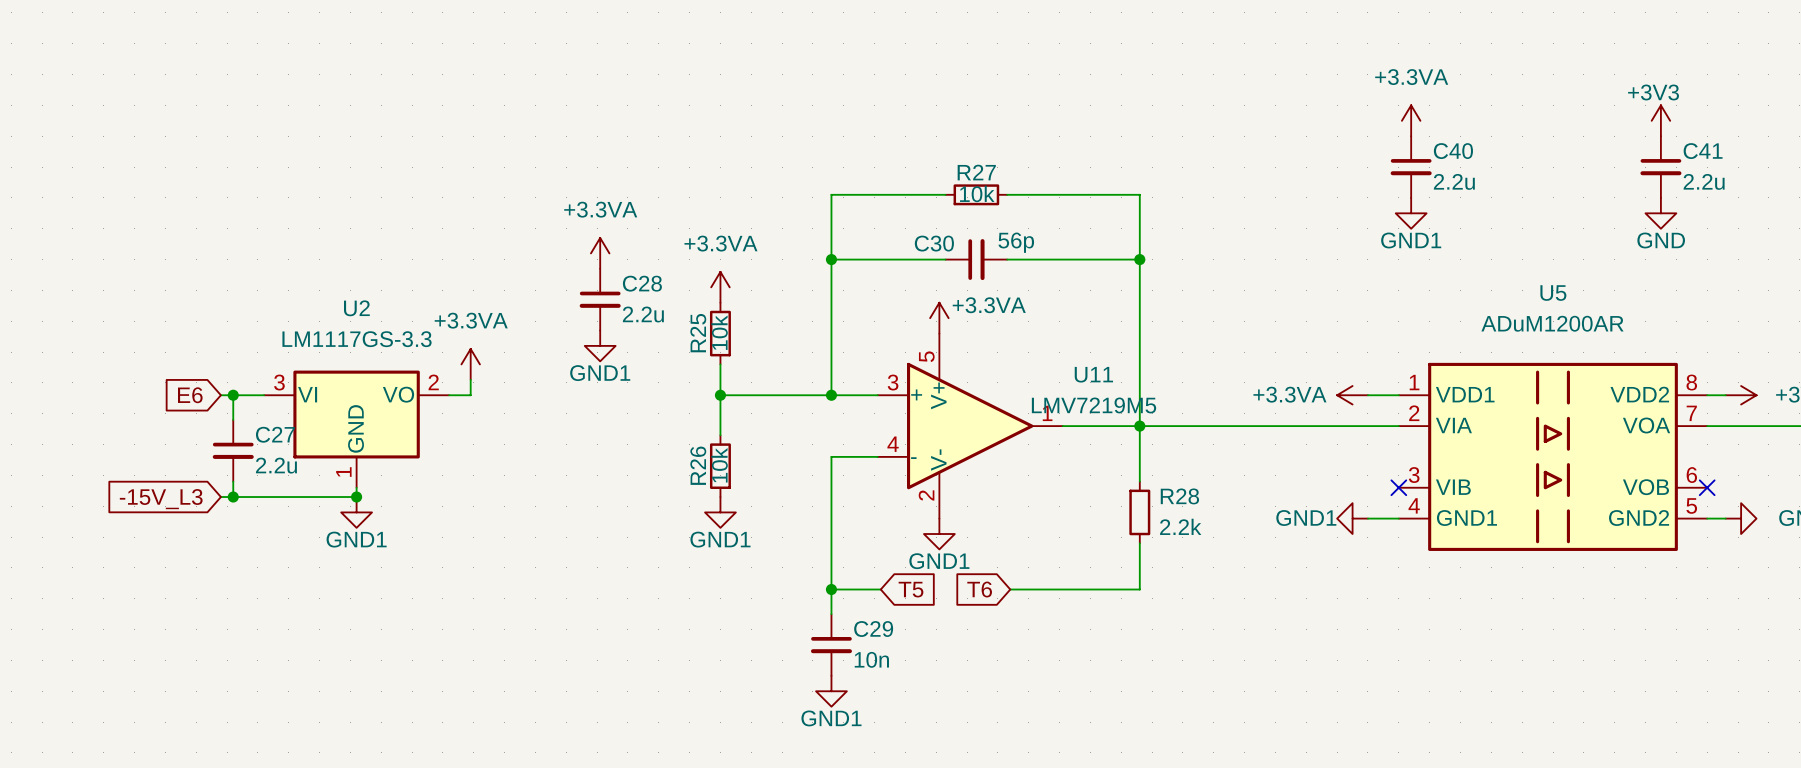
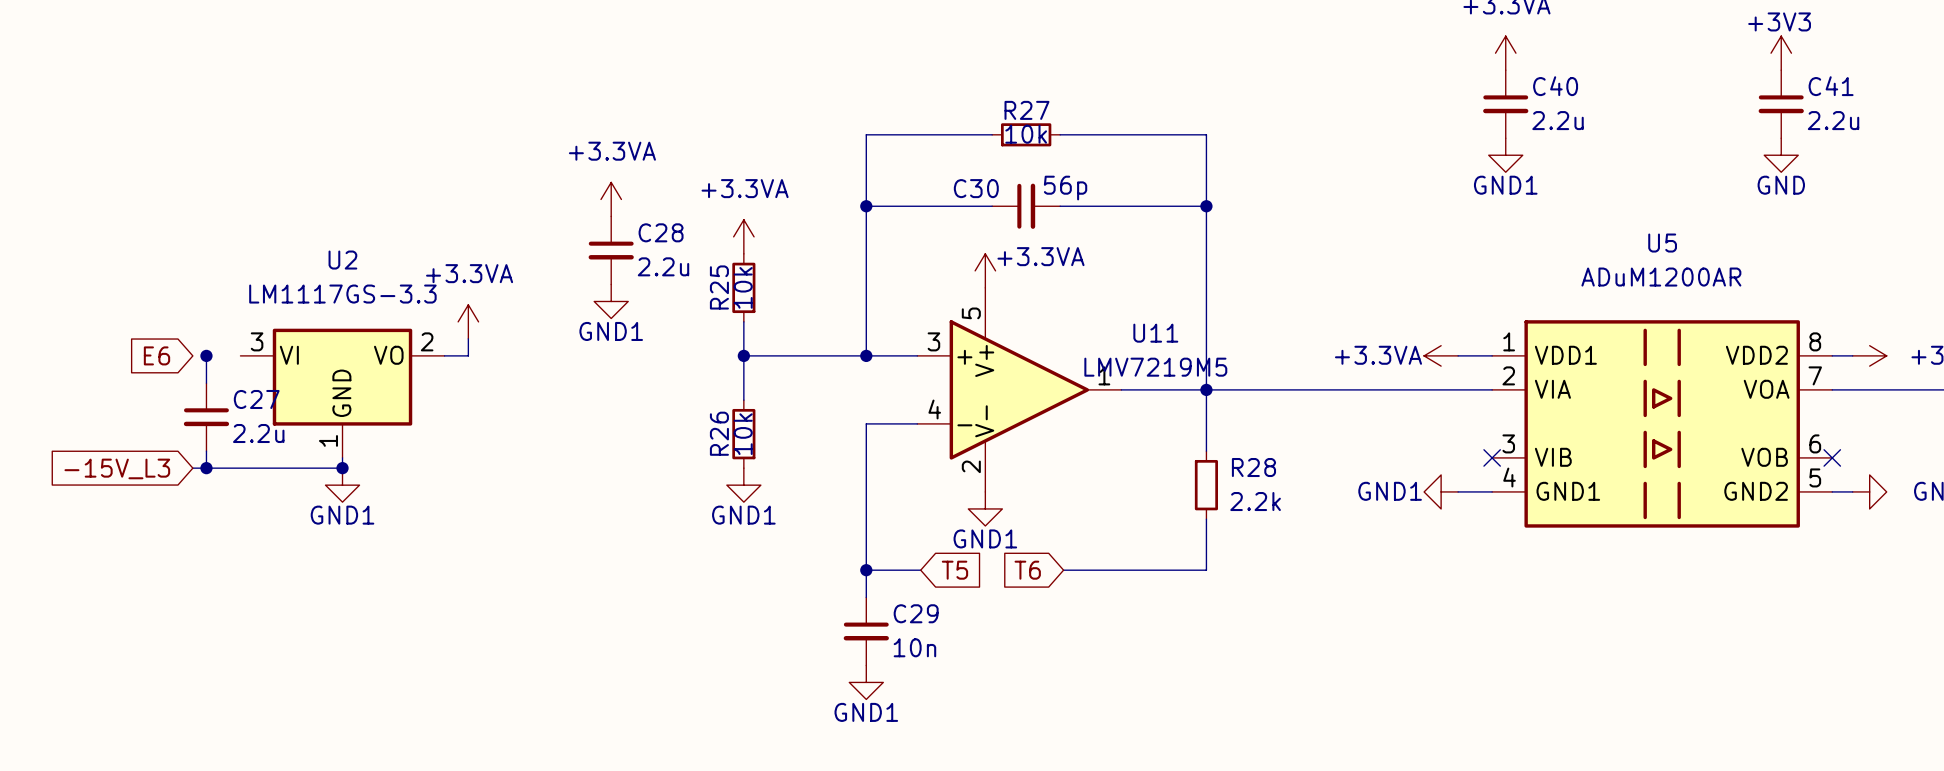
wire: (220, 395) (264, 395) -> none

